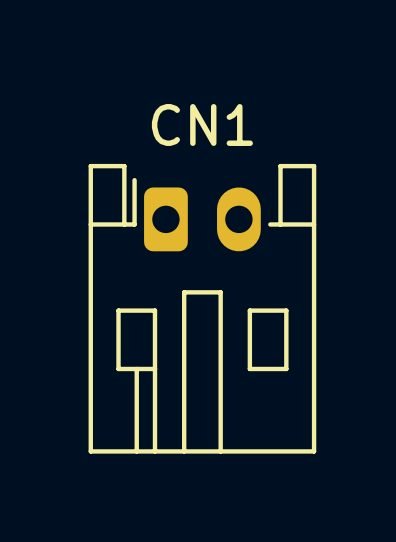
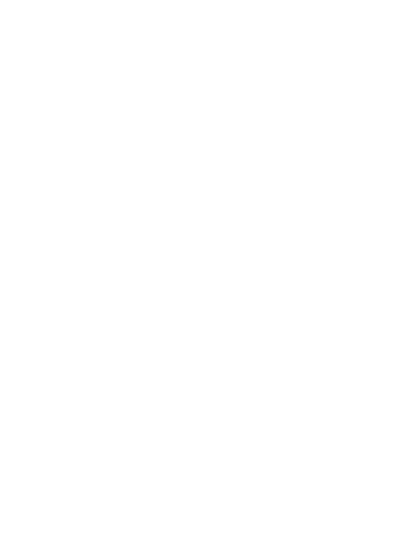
CN1: (202, 308) -> none

